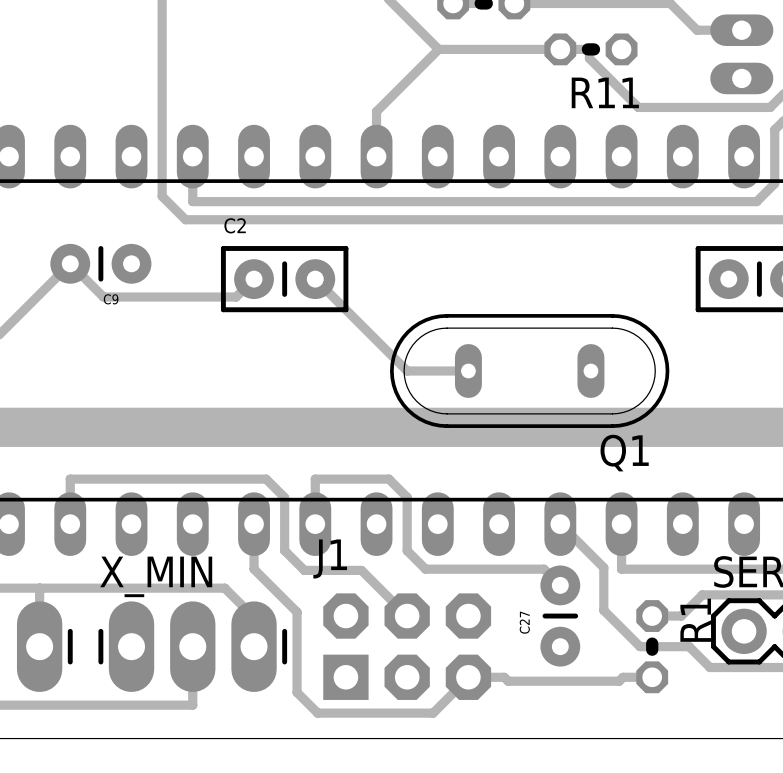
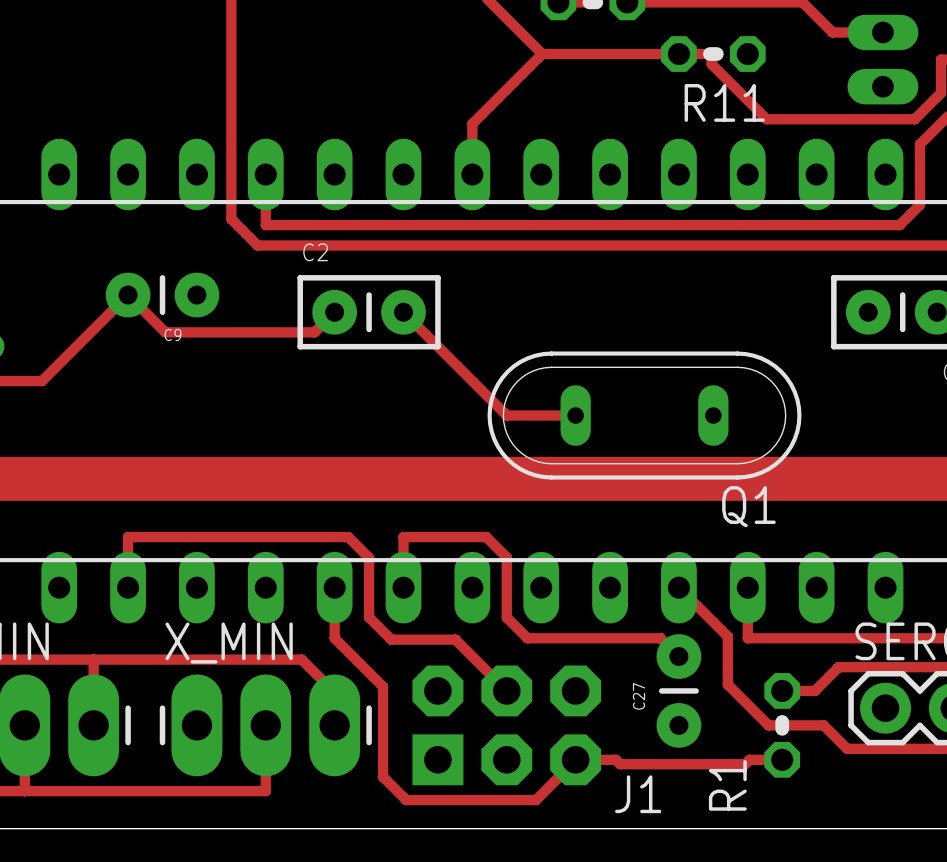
J1 name position: J1 (330, 558) -> J1 (638, 794)
R1 name position: R1 (695, 620) -> R1 (727, 785)

